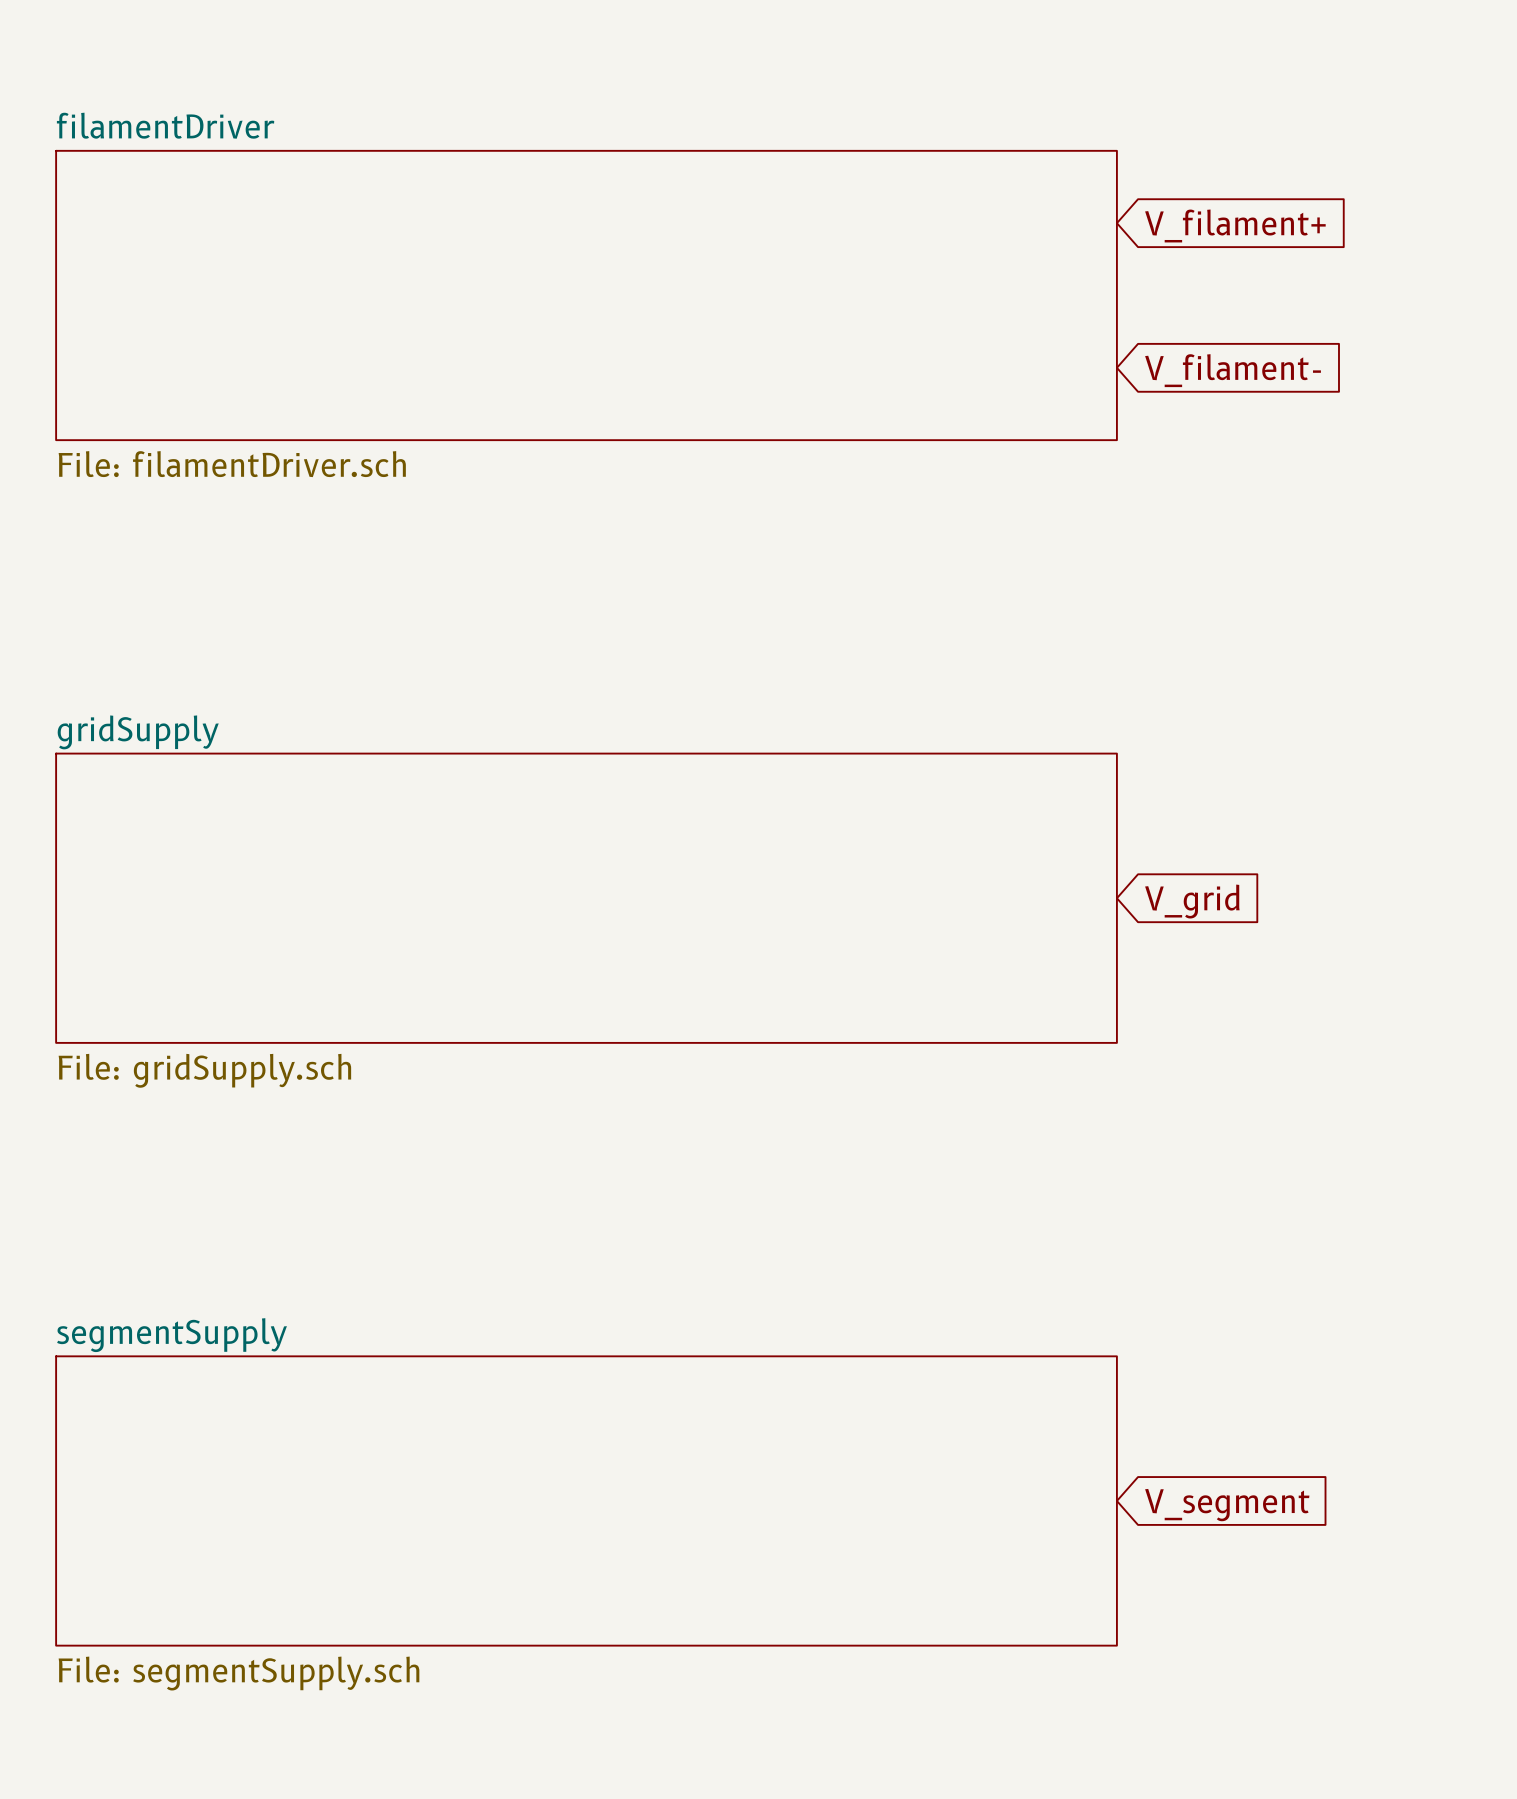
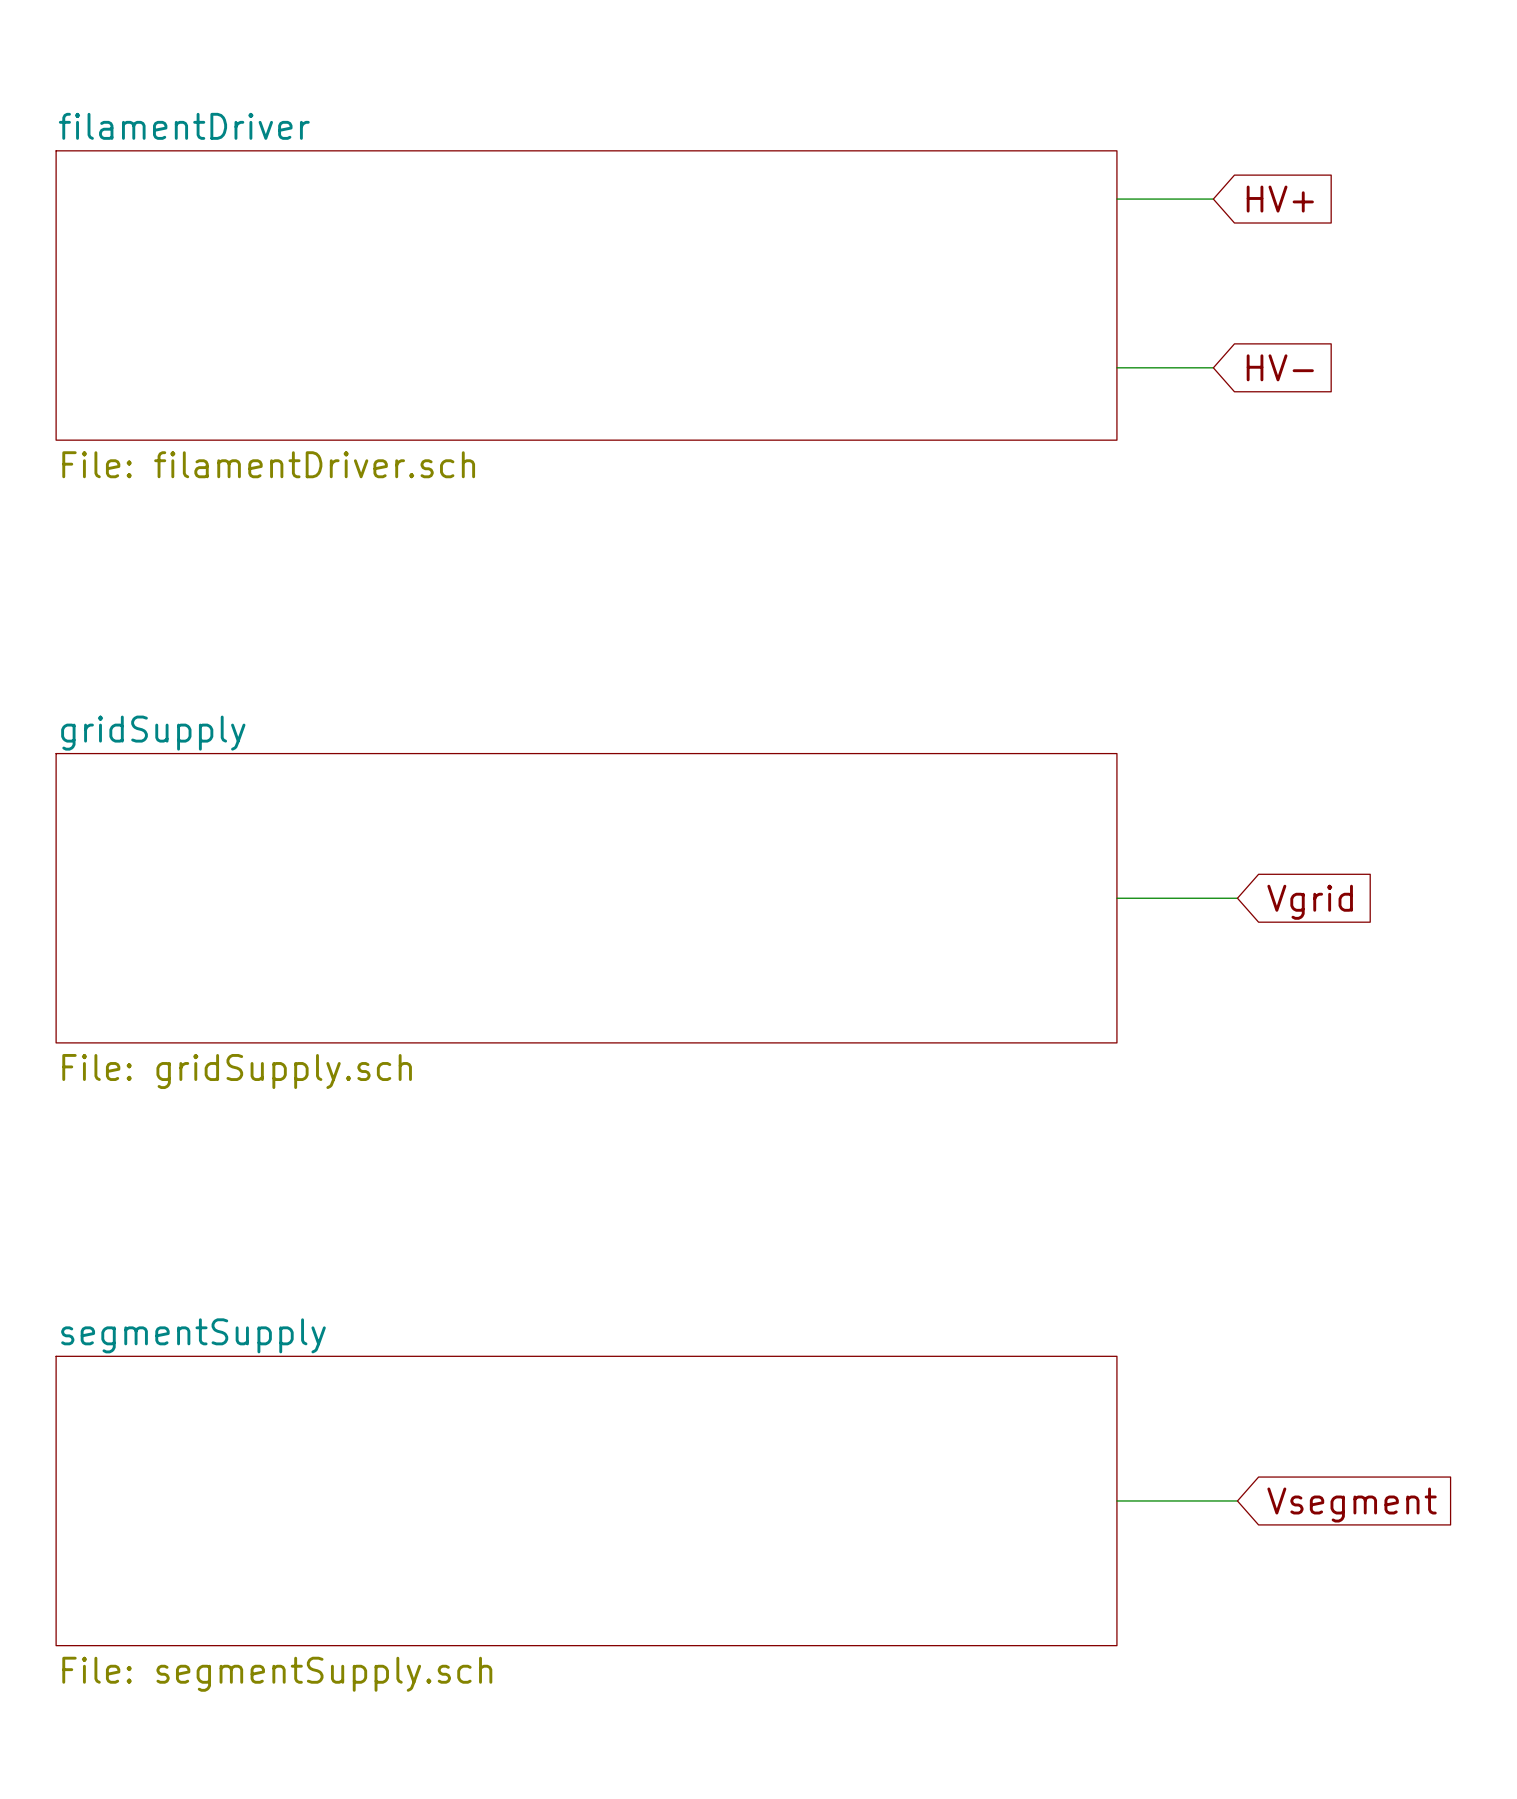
wire: none -> (1116, 199) (1213, 199)
global label: none -> HV+ (1280, 199)
global label: V_filament+ (1235, 225) -> none
wire: none -> (1116, 367) (1213, 367)
global label: none -> HV- (1280, 367)
global label: V_filament- (1233, 370) -> none
wire: none -> (1116, 898) (1237, 898)
global label: V_grid (1192, 901) -> Vgrid (1310, 902)
wire: none -> (1116, 1500) (1237, 1500)
global label: V_segment (1227, 1505) -> Vsegment (1352, 1505)

